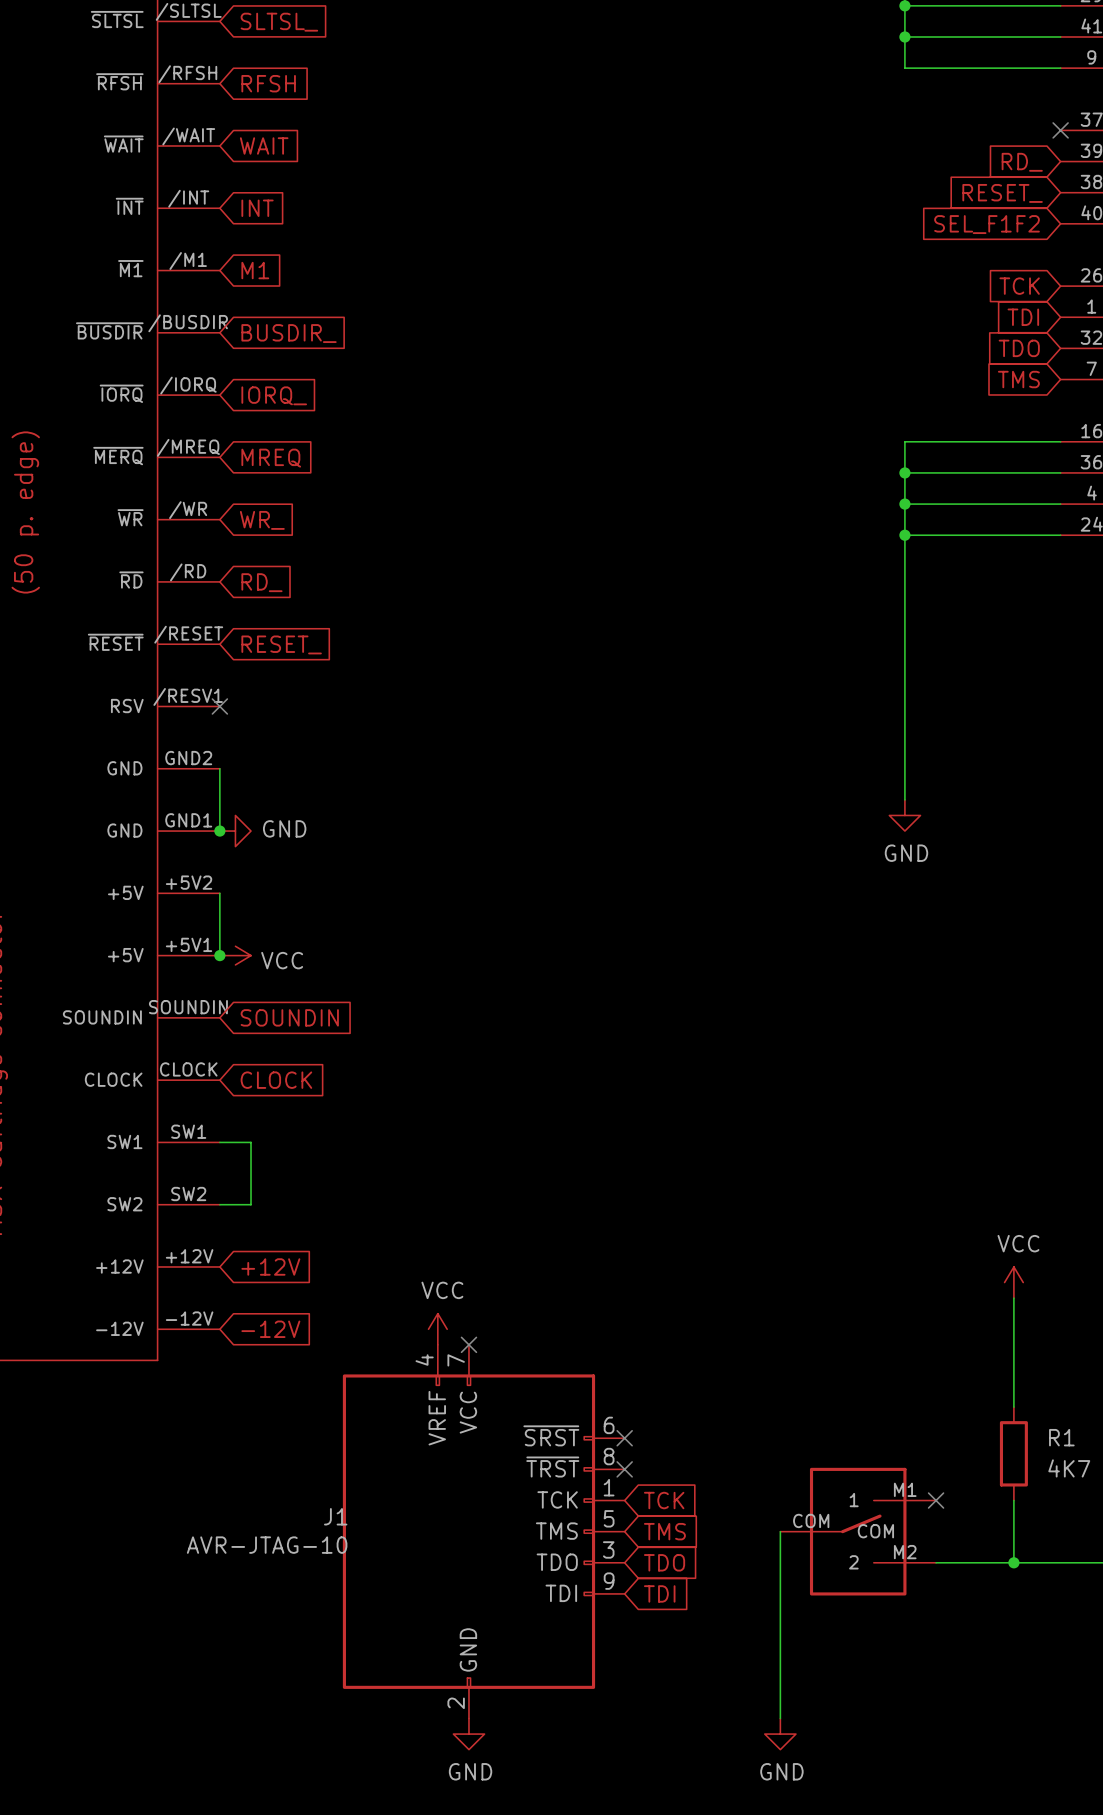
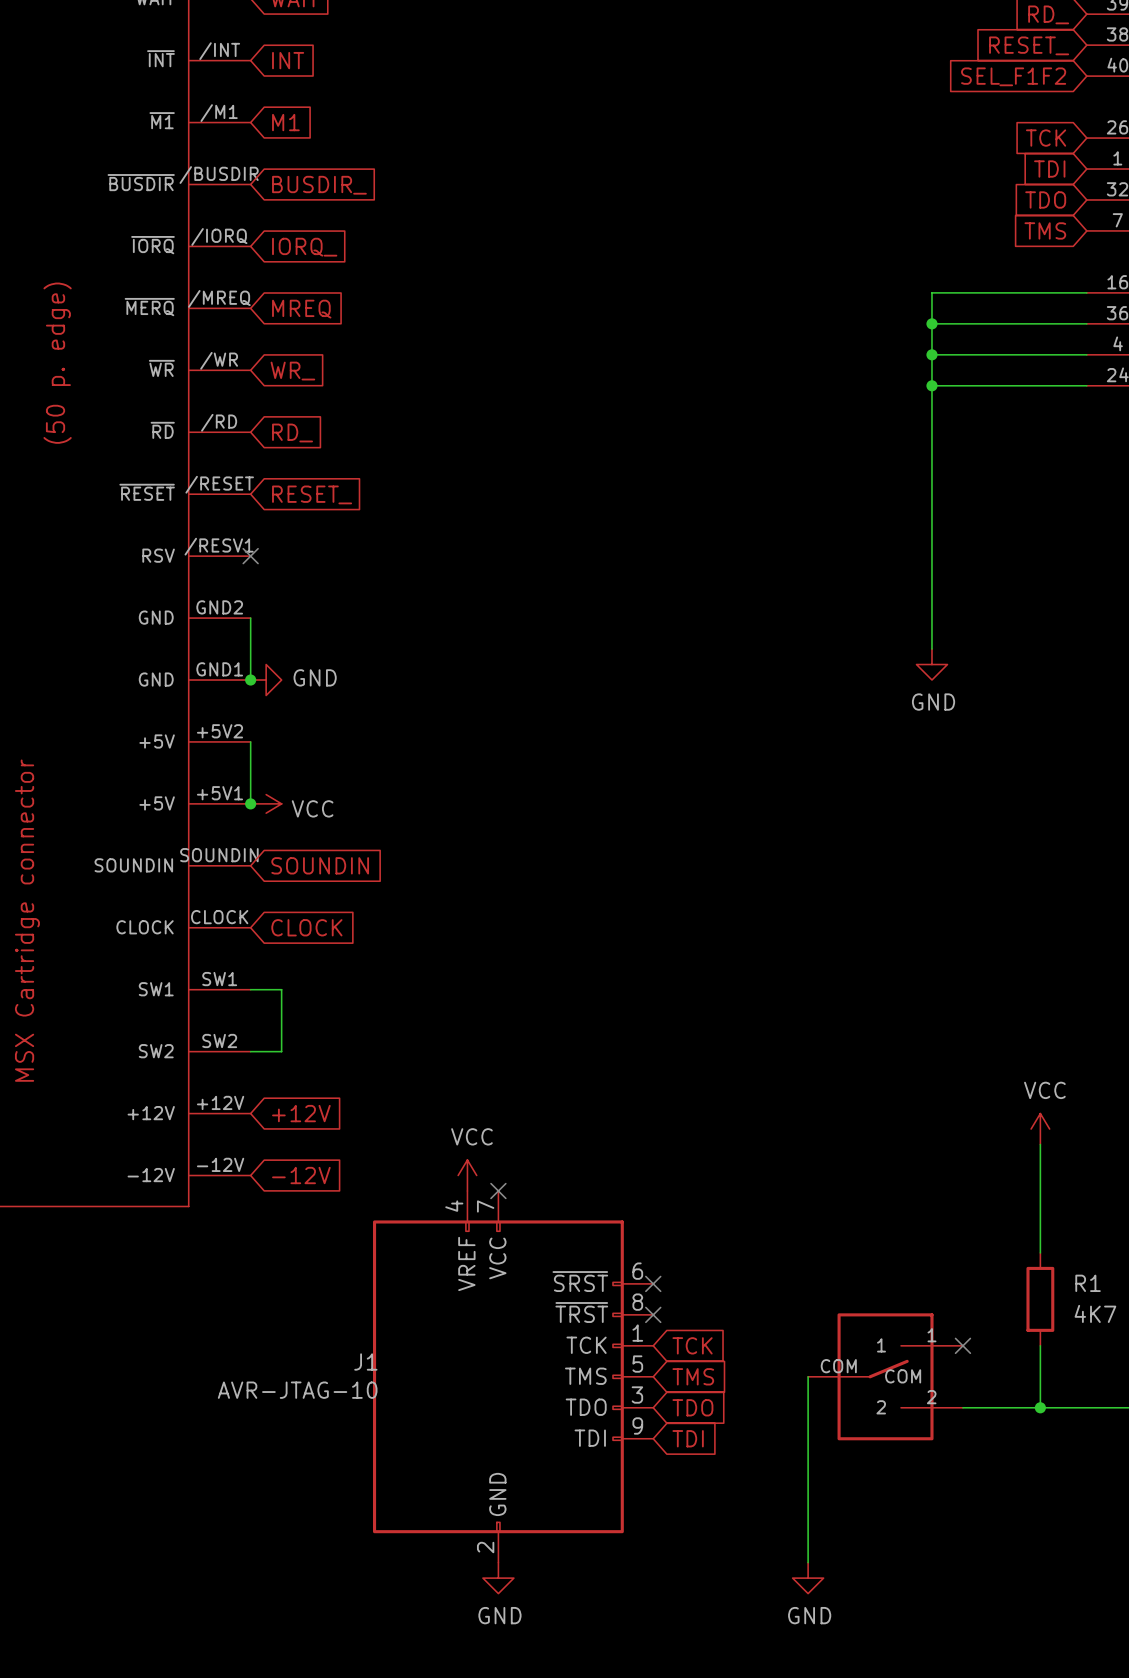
part pin number: M1 (905, 1489) -> 1 (931, 1335)
part pin number: M2 (905, 1552) -> 2 (931, 1397)

